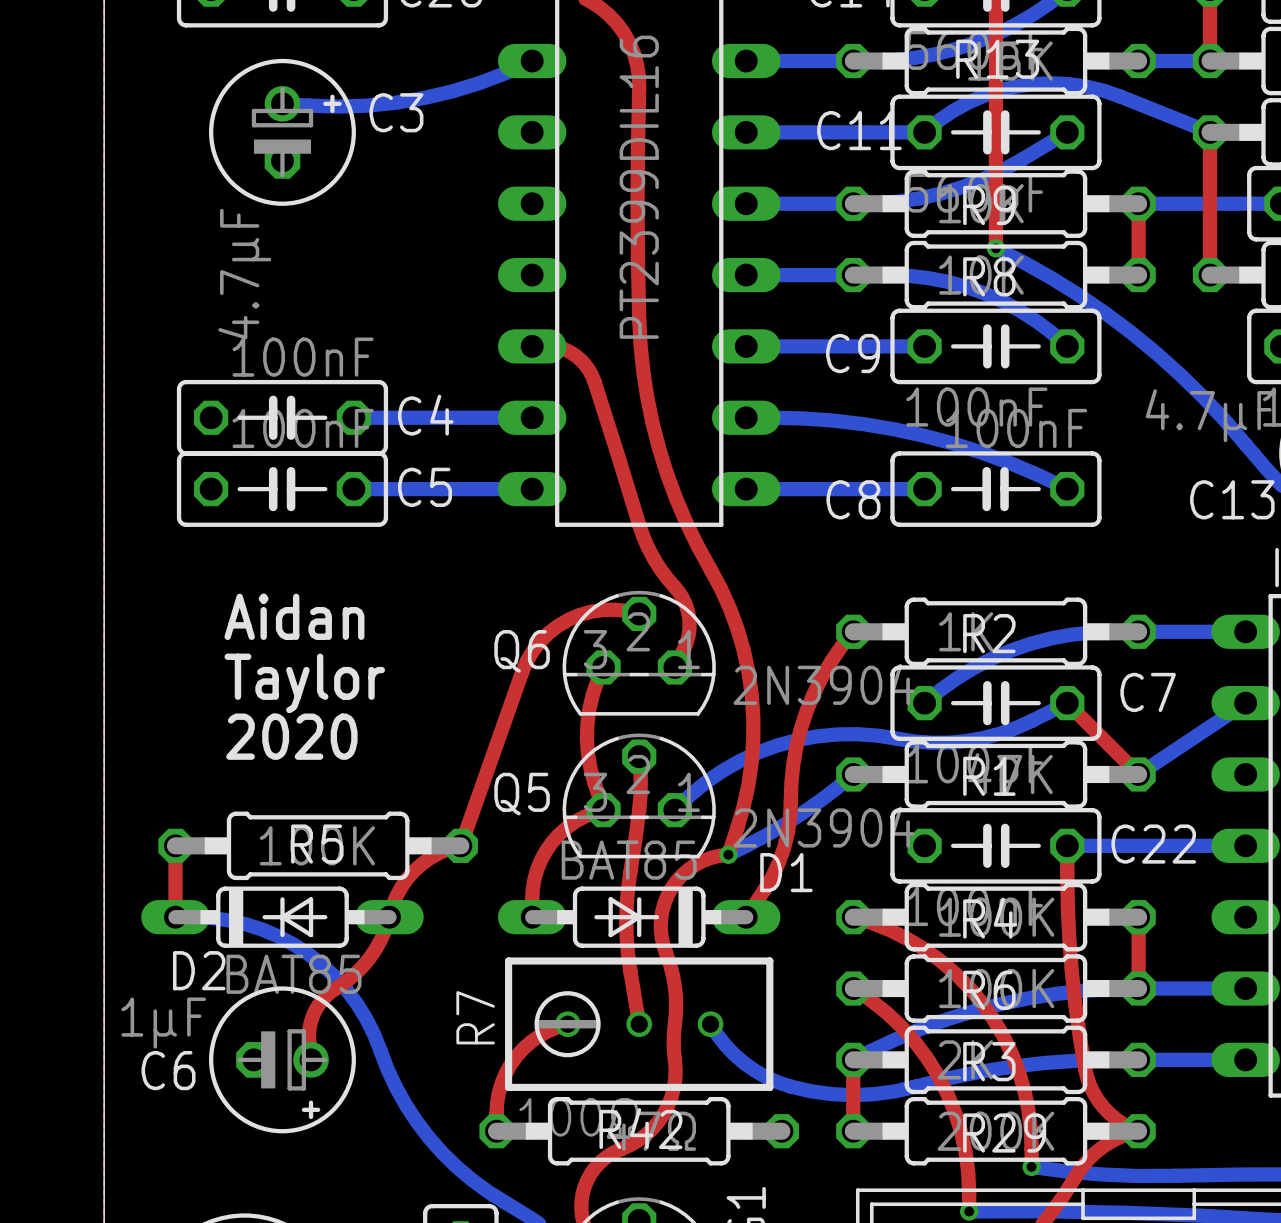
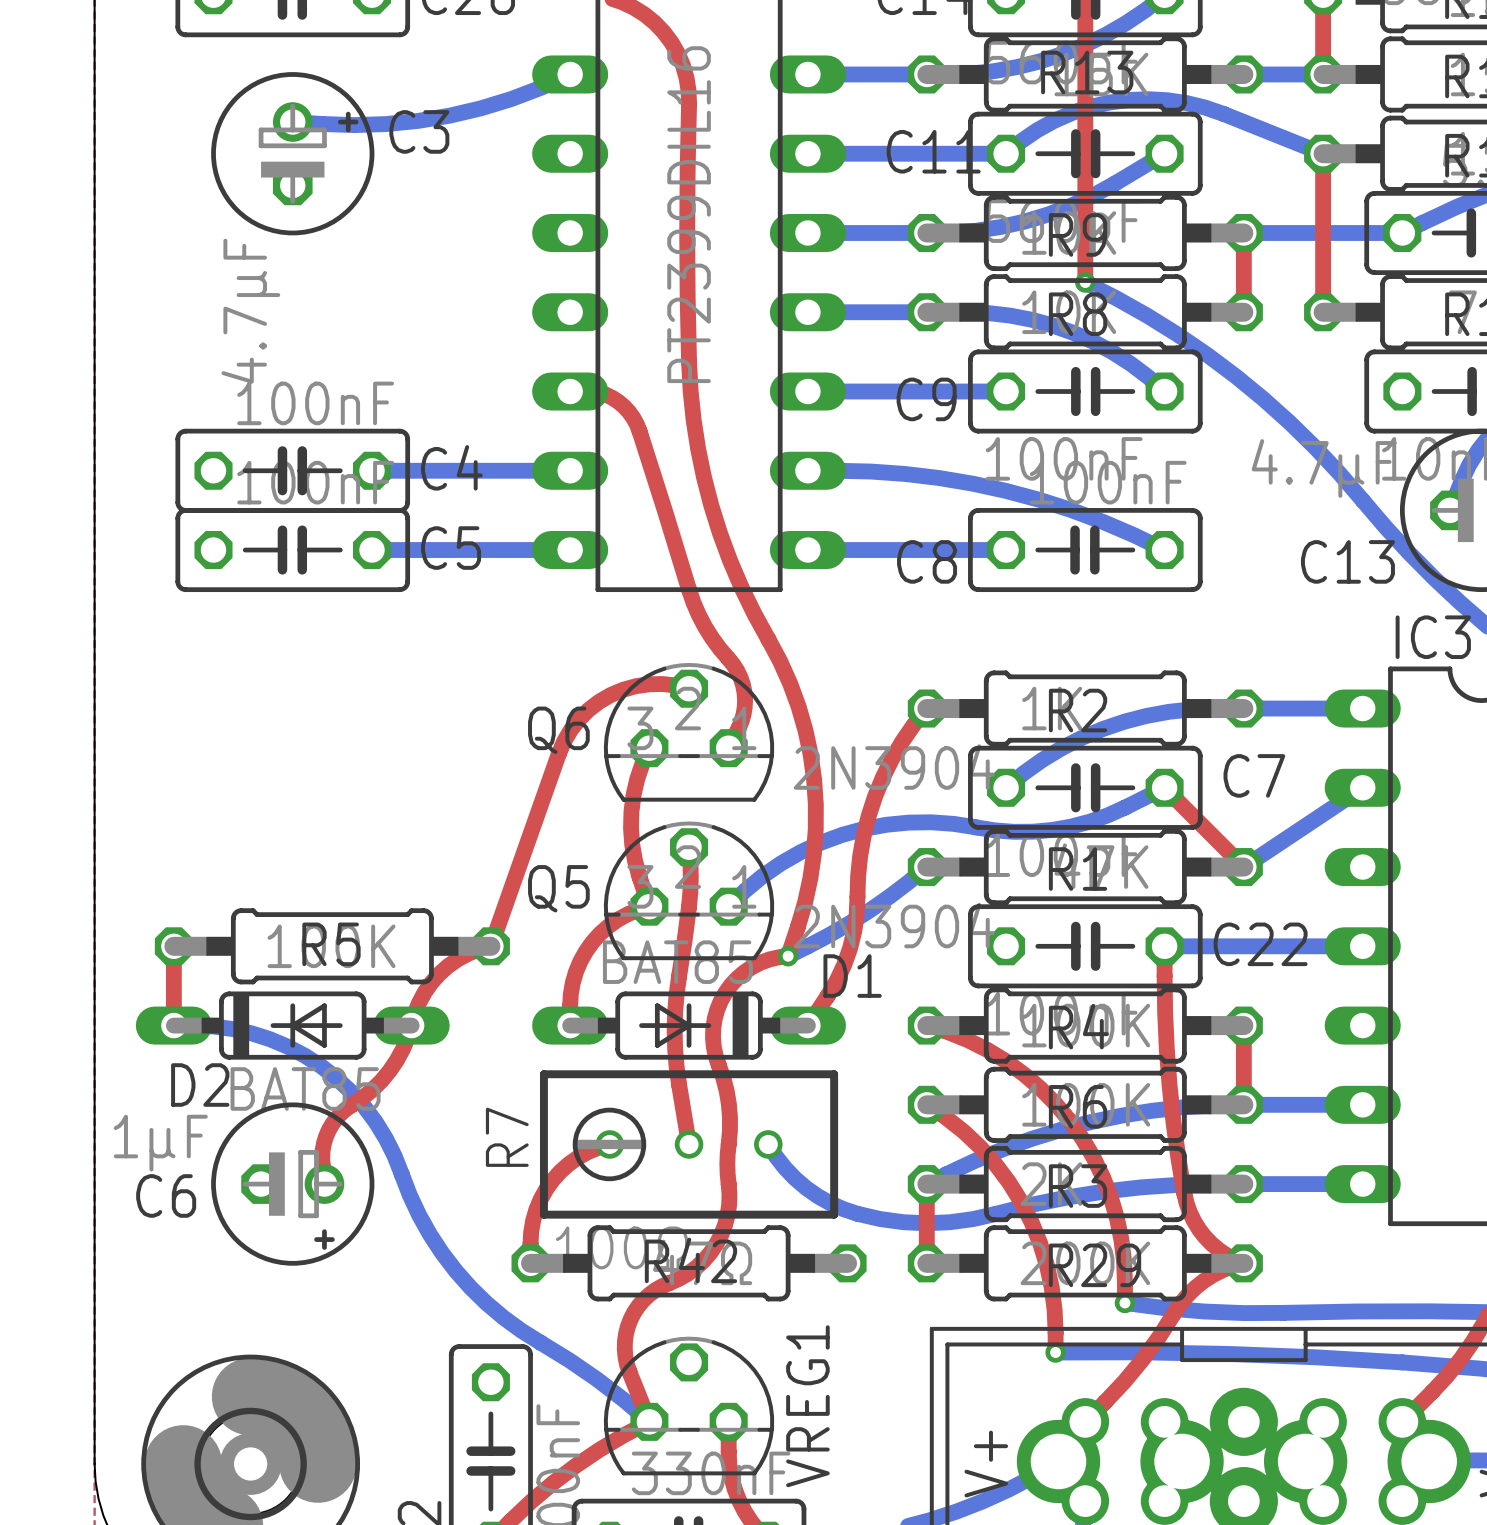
text: Aidan (294, 616) -> none
text: Taylor (304, 683) -> none
text: 2020 (291, 736) -> none

